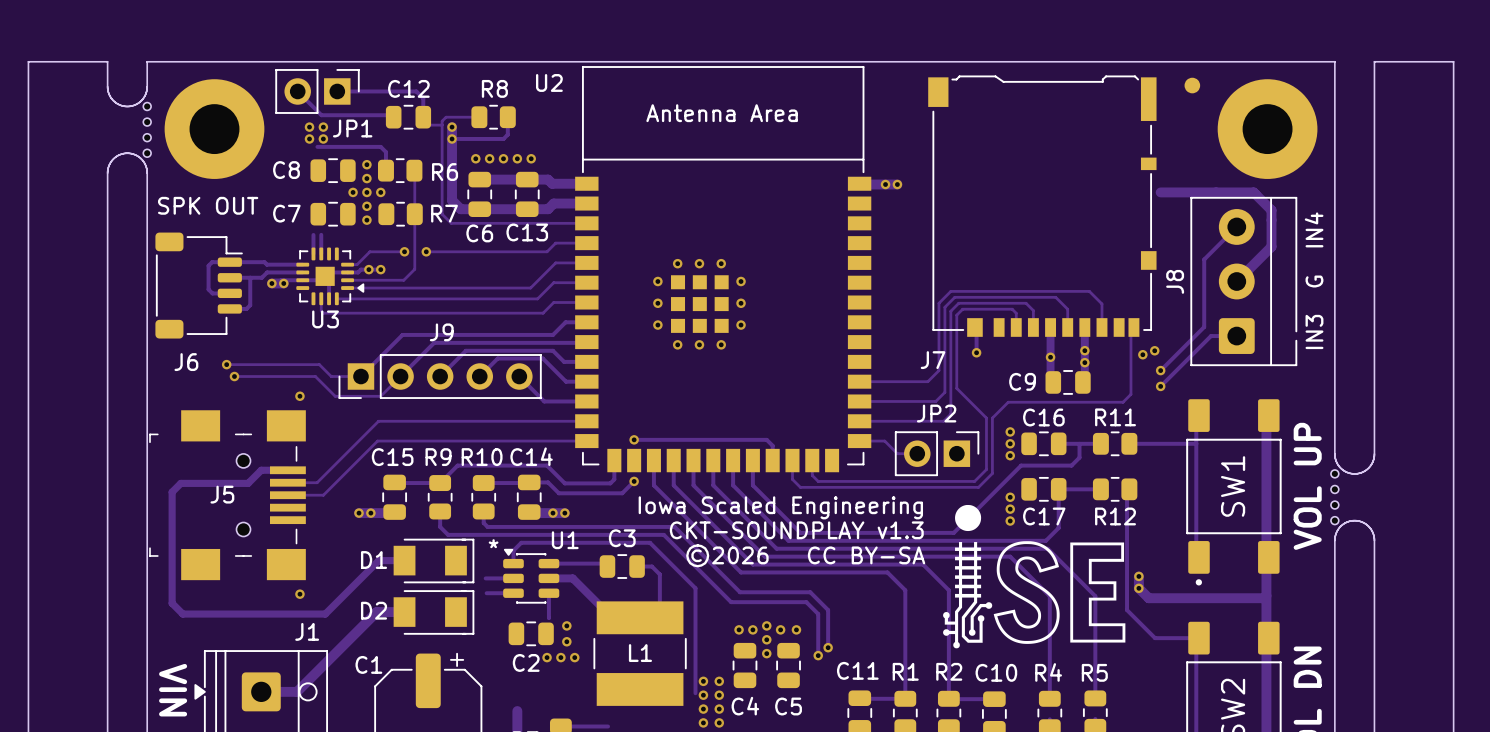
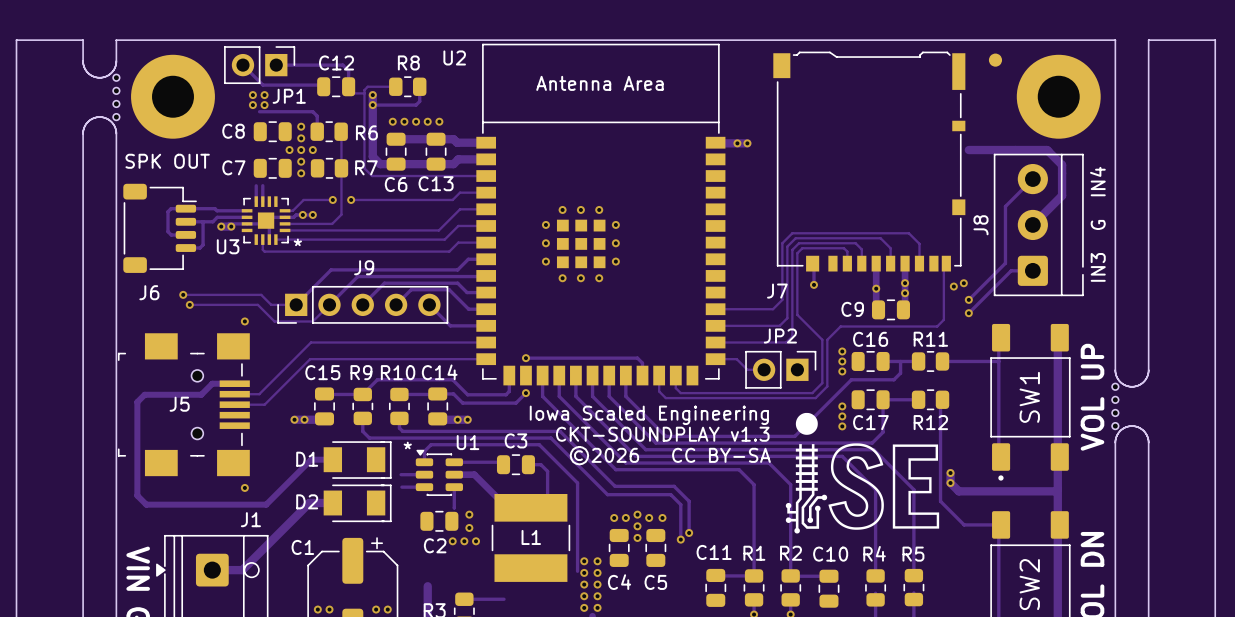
U3 footprint: [296, 247, 365, 306] -> [241, 196, 291, 245]
U3 name position: U3 (325, 319) -> U3 (228, 246)

